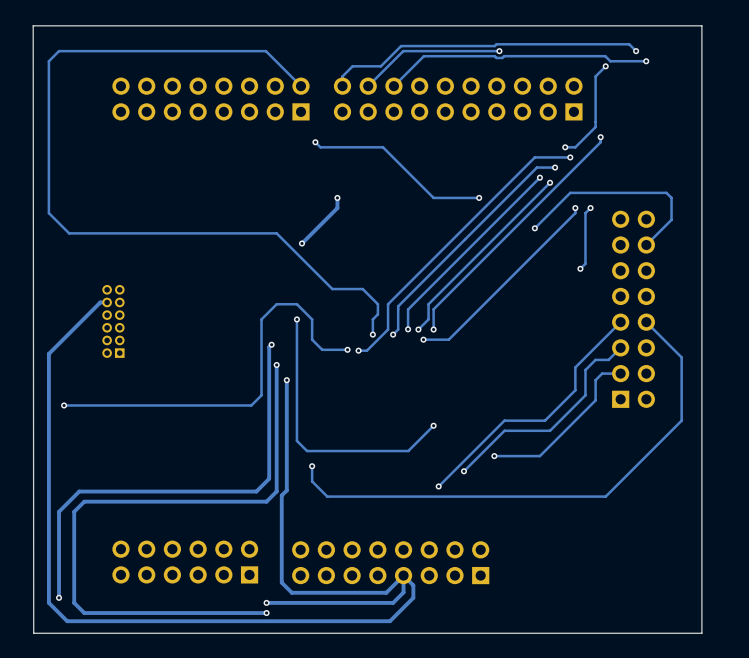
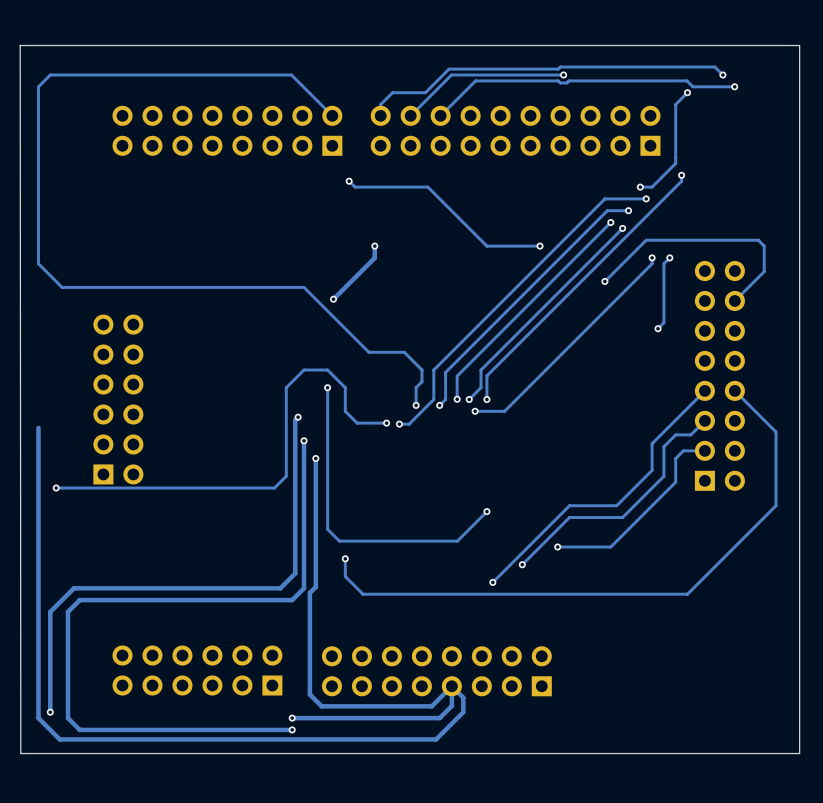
part footprint: [102, 285, 125, 358] -> [93, 314, 144, 485]
track: (107, 302) (100, 302) (48, 353) -> none

